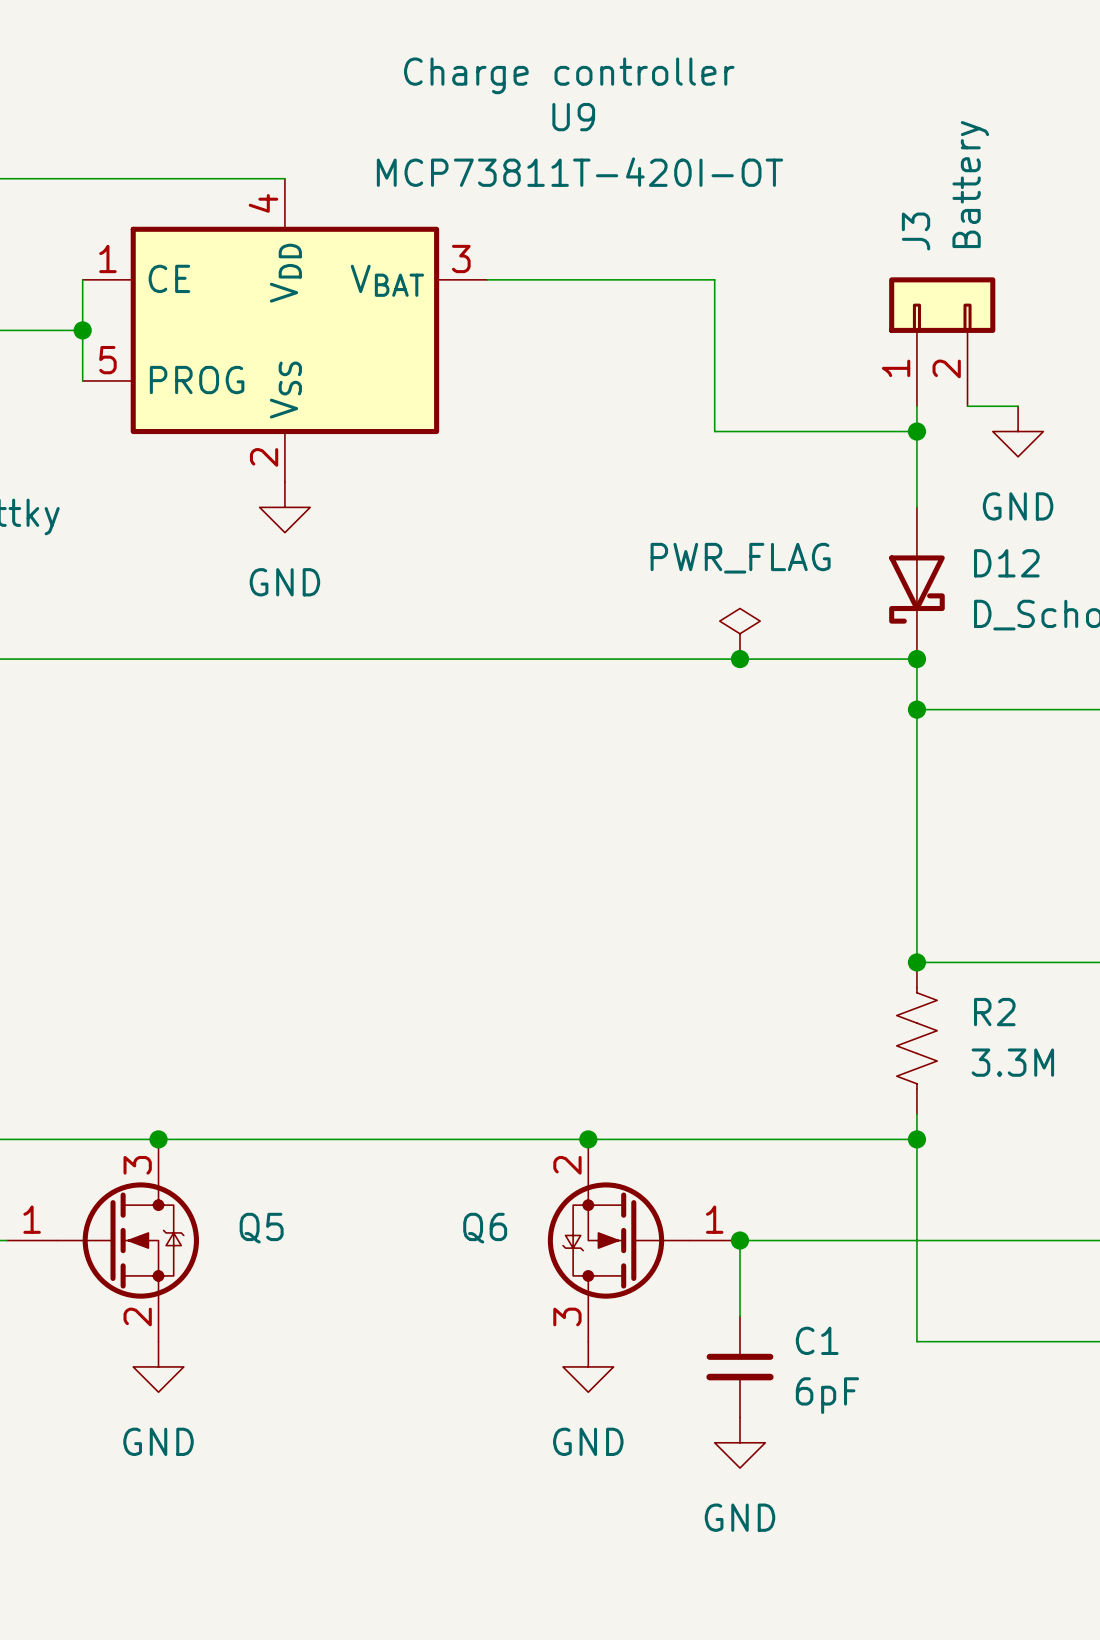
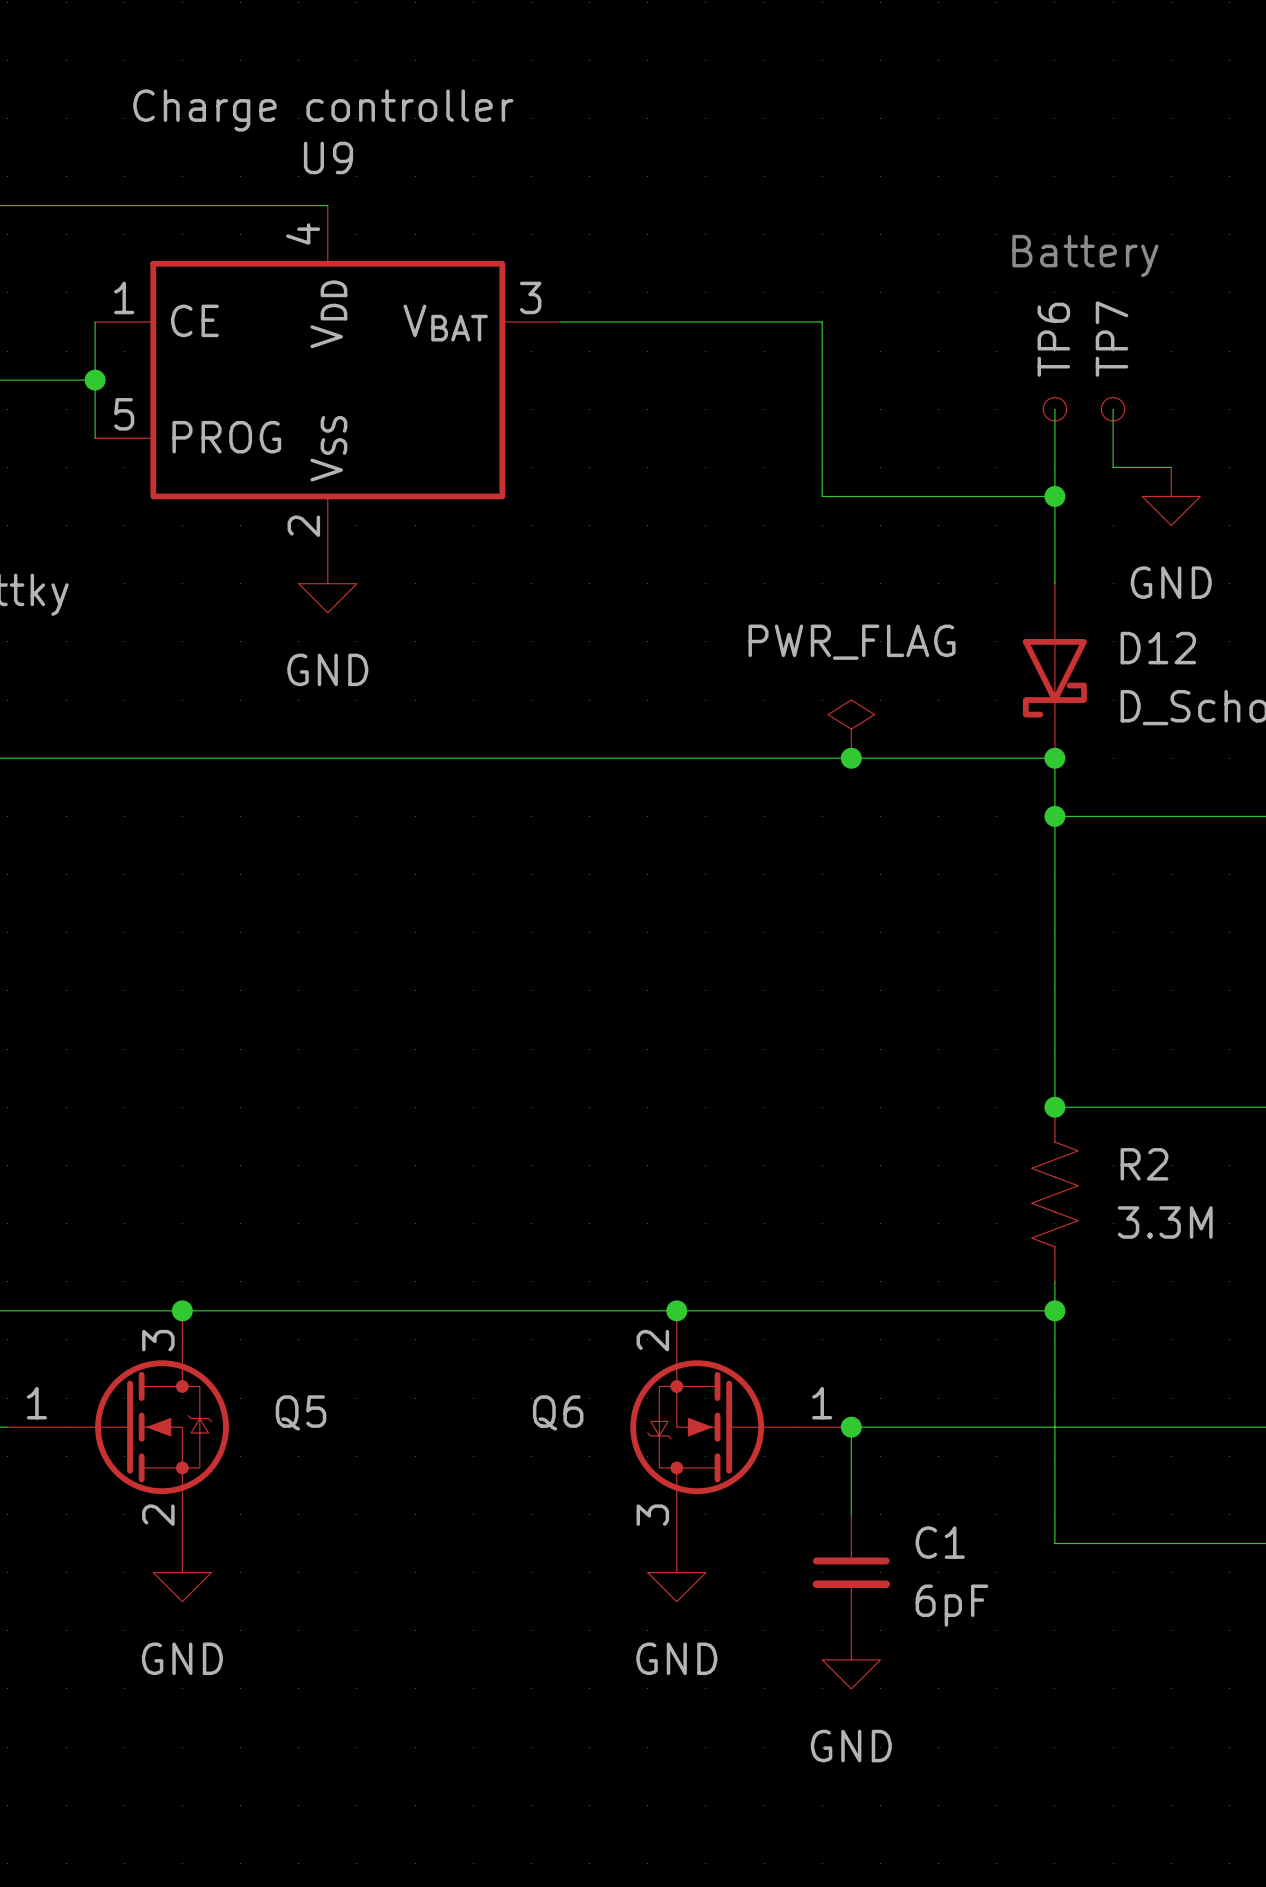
U9 text position: Charge controller (569, 75) -> Charge controller (323, 110)
U9 name position: U9 (573, 117) -> U9 (328, 157)
U9 value: MCP73811T-420I-OT (579, 172) -> none
text: none -> Battery (1085, 256)
J3: Battery (942, 341) -> none
TP6: none -> (1054, 409)
TP7: none -> (1113, 409)

